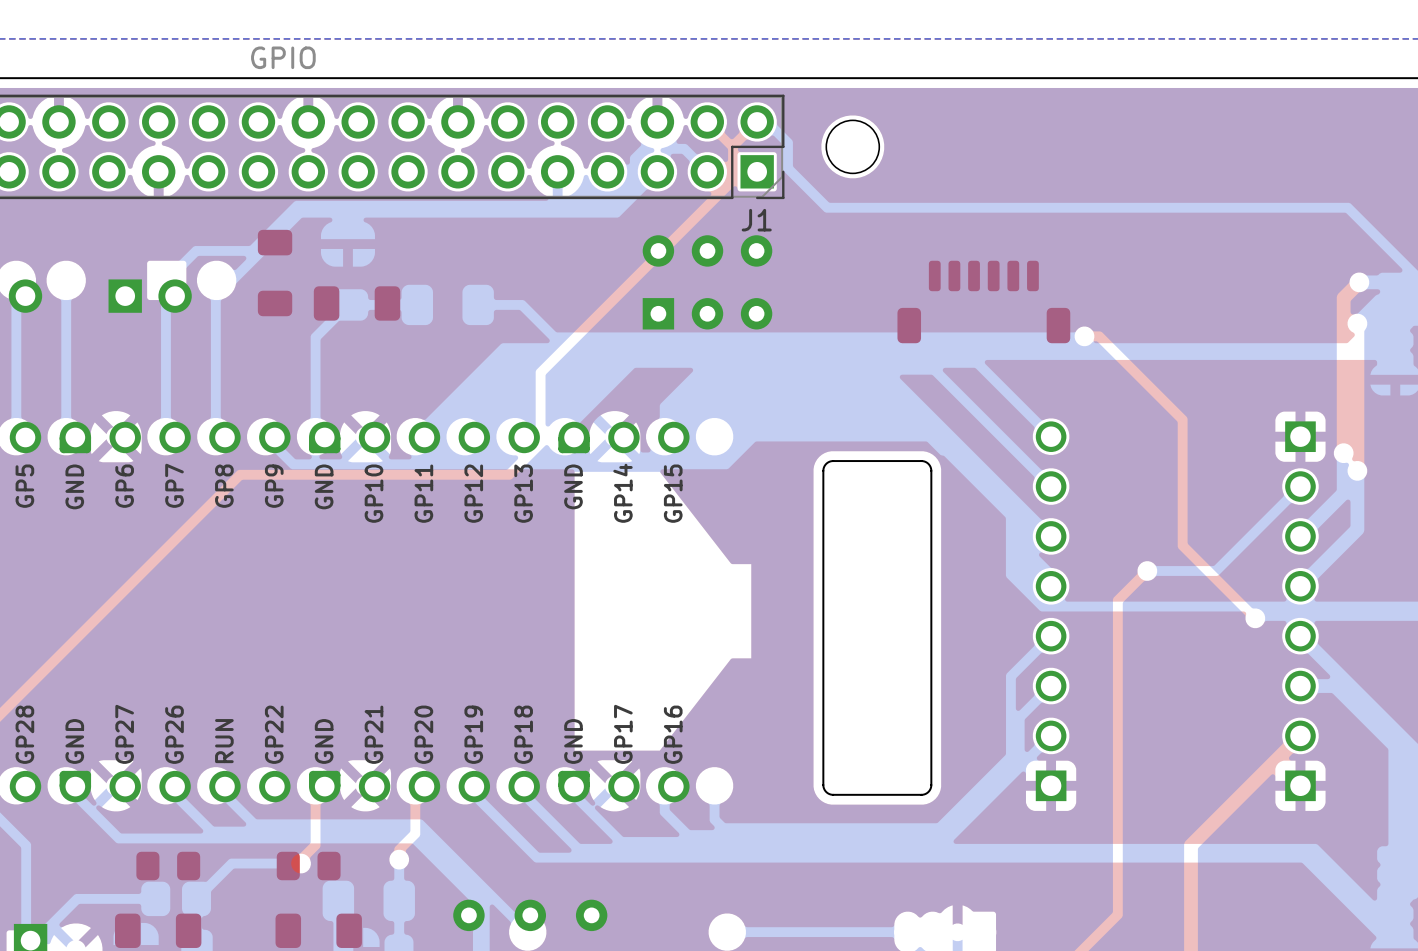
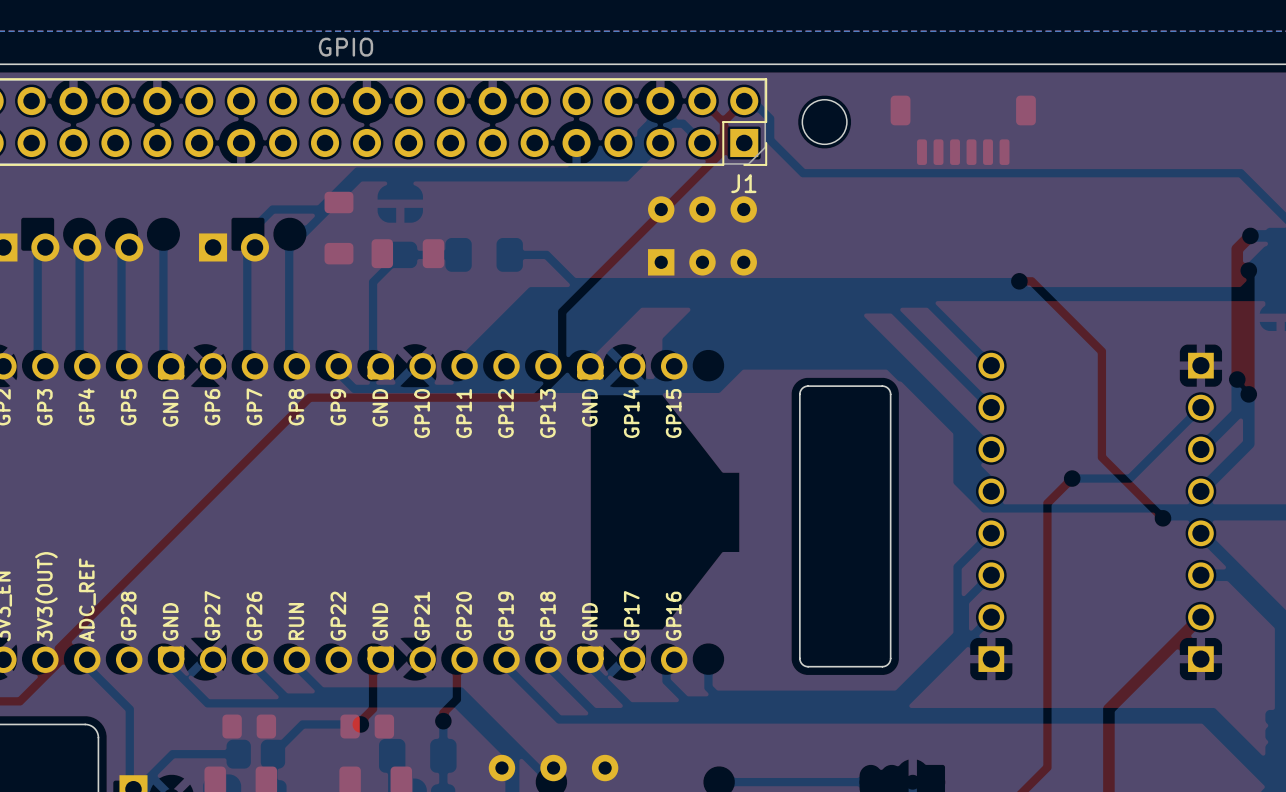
part rotation: 0° (983, 302) -> 180° (963, 130)
part position: (983, 302) -> (963, 130)

